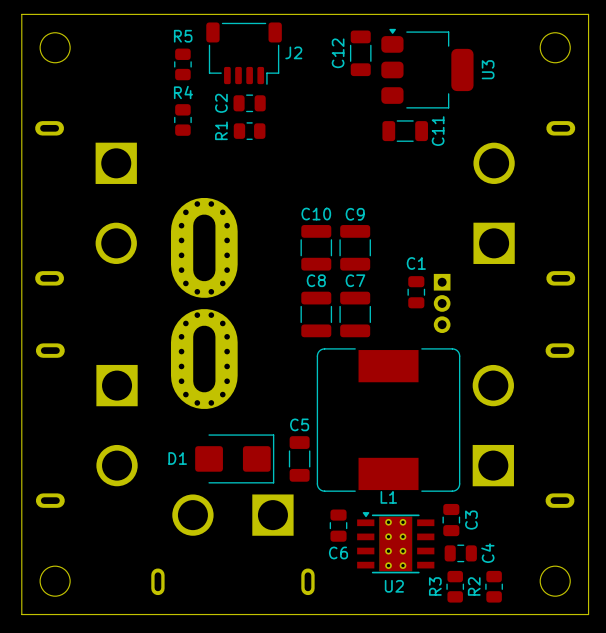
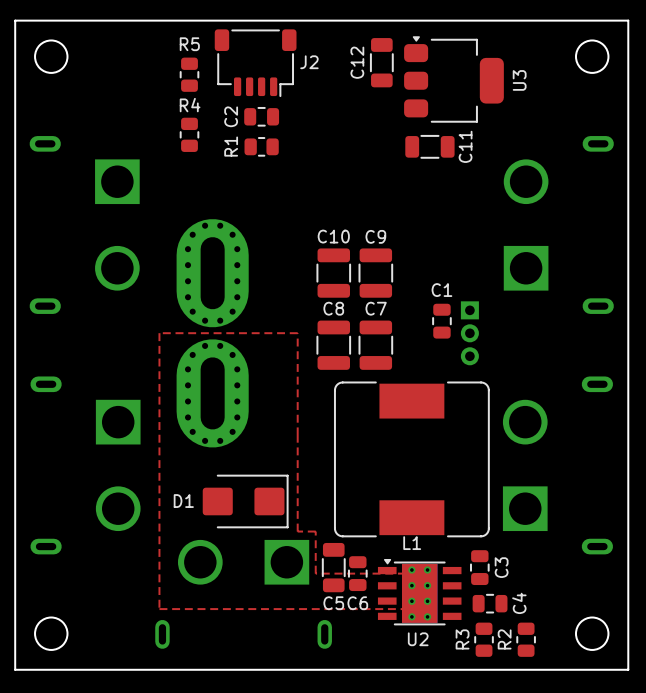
top zone outline: none -> (159, 333) (159, 609) (405, 609) (405, 573) (315, 573) (315, 531) (297, 531) (297, 333) (159, 333)
C5 name position: C5 (299, 424) -> C5 (333, 603)
C5 position: (299, 458) -> (333, 567)

